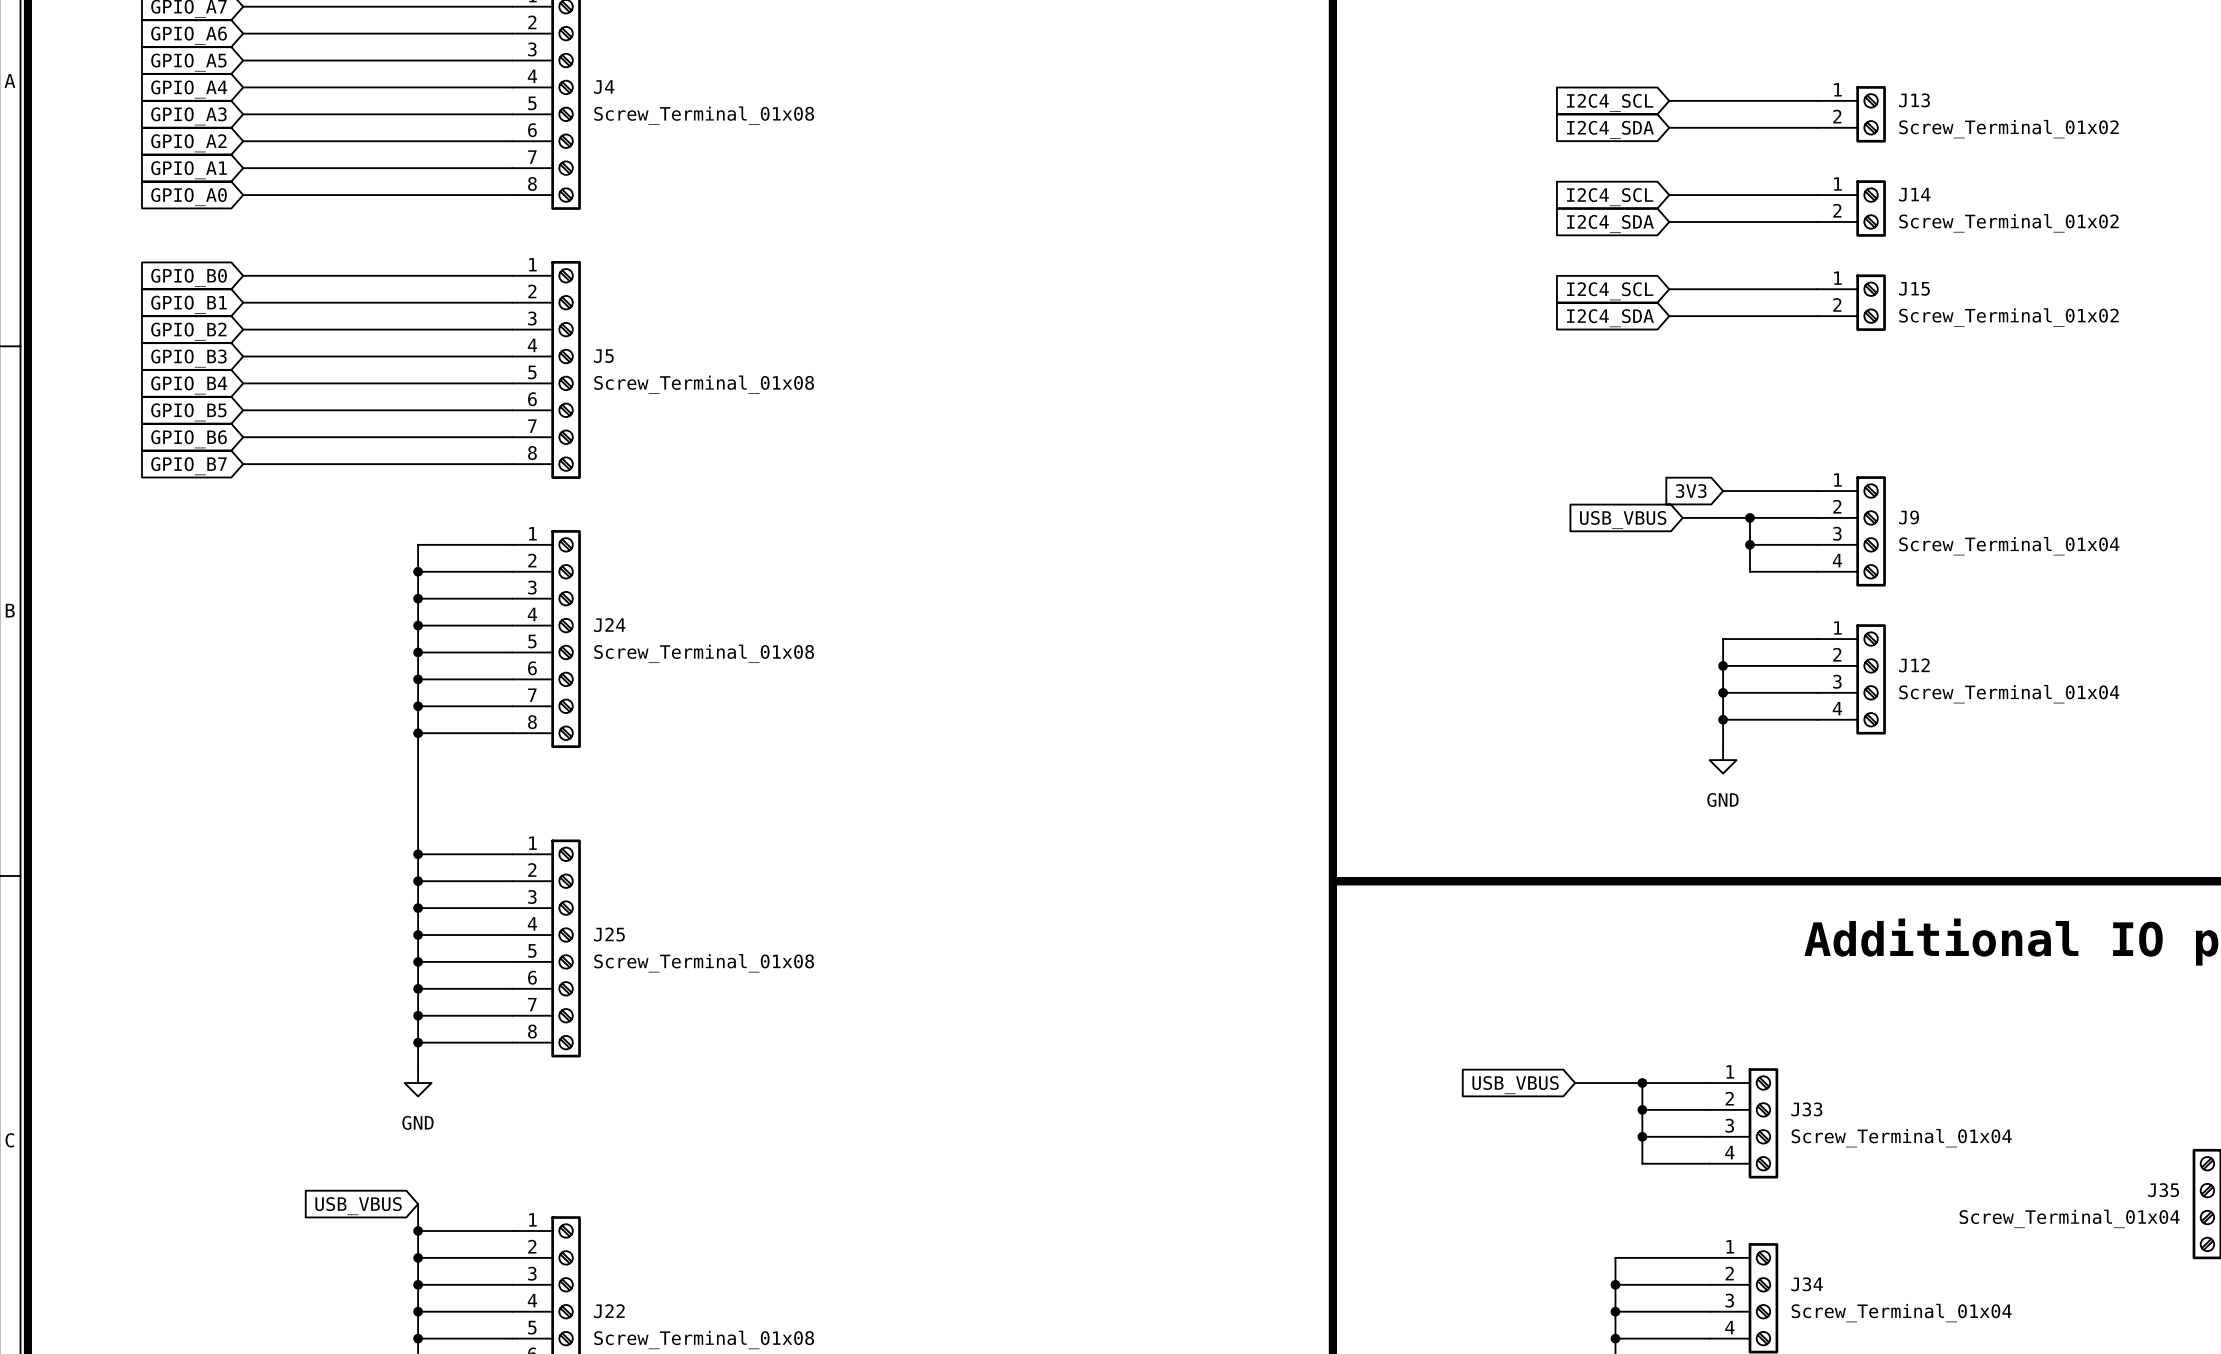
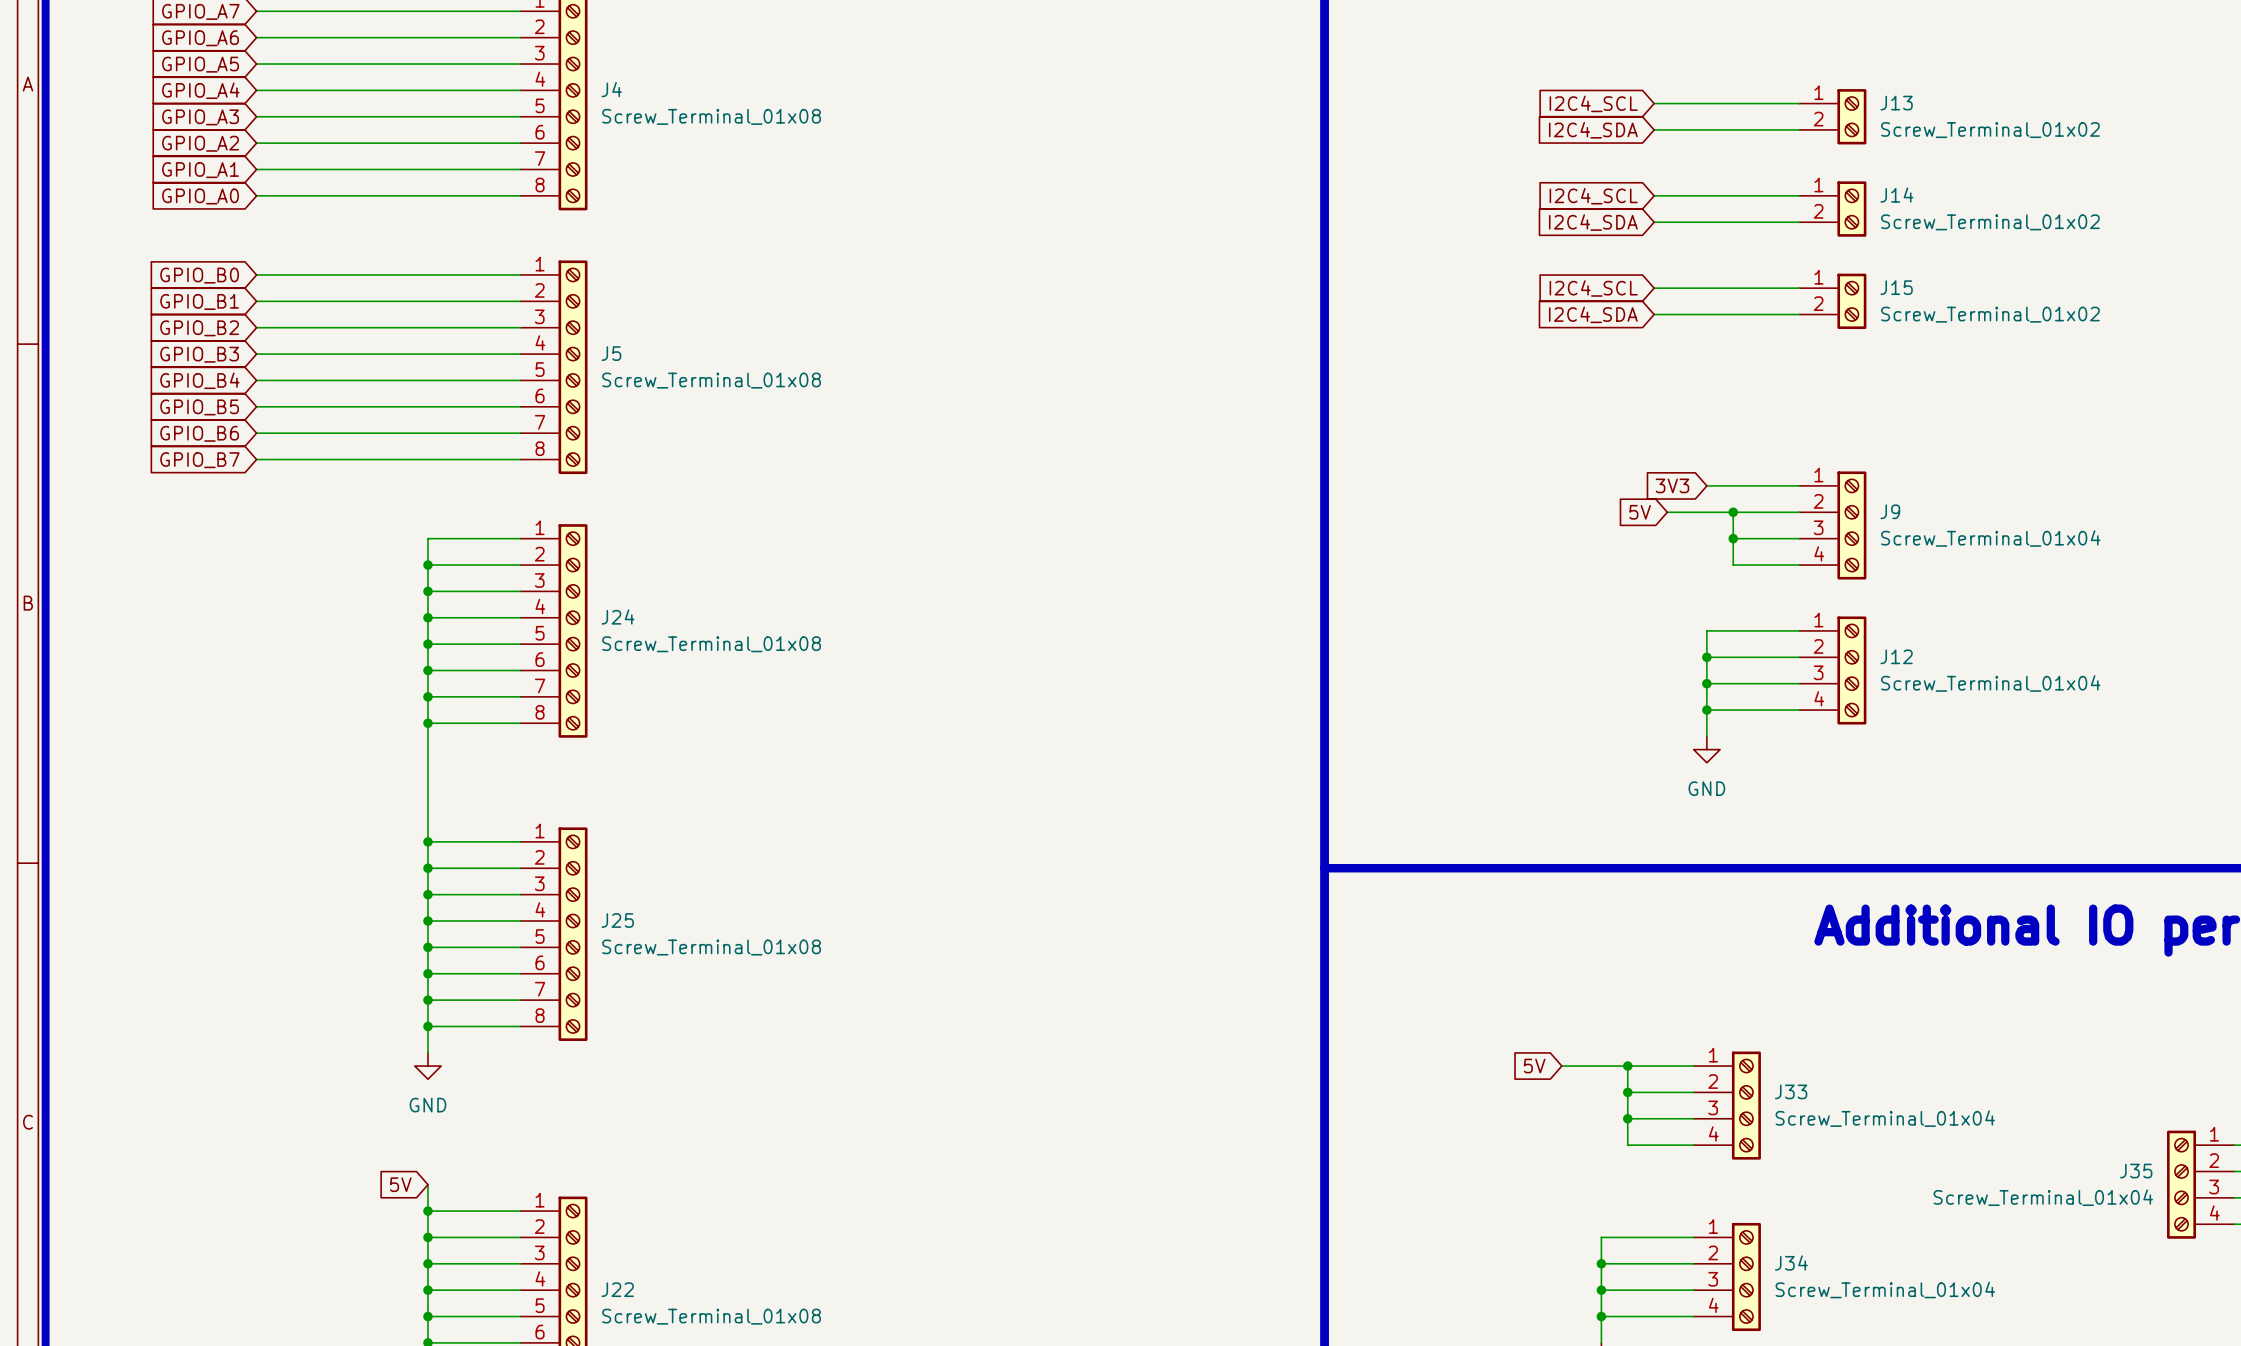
global label: USB_VBUS (1623, 520) -> 5V (1640, 512)
global label: USB_VBUS (1515, 1085) -> 5V (1534, 1066)
global label: USB_VBUS (358, 1206) -> 5V (400, 1184)

